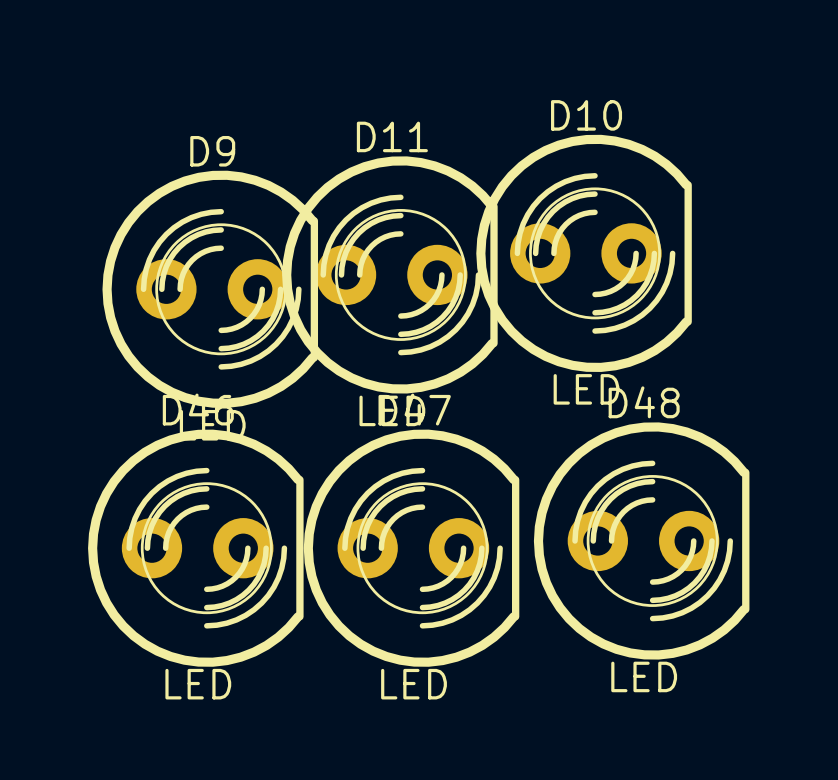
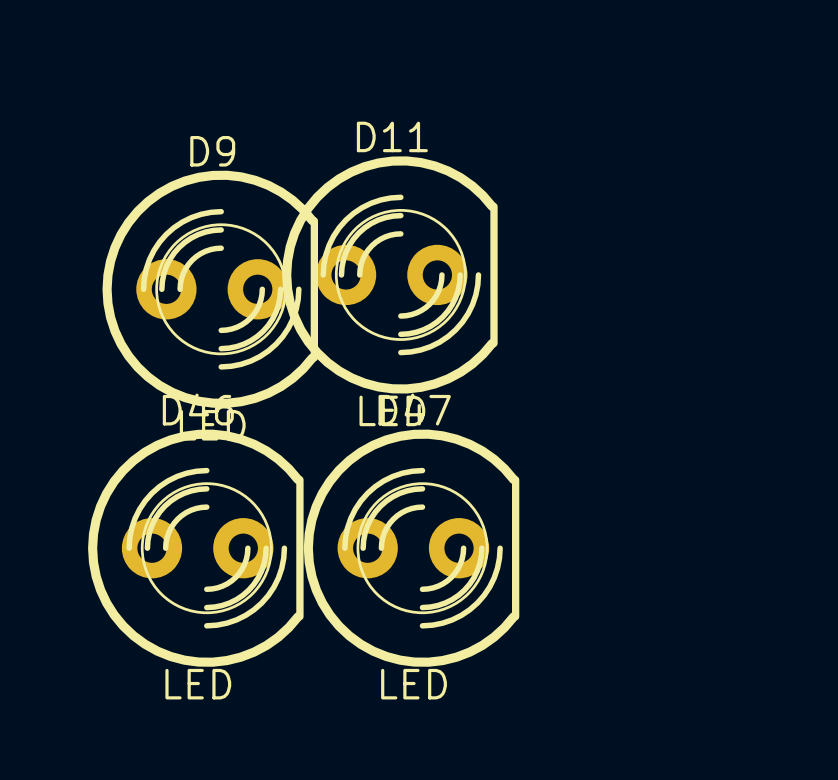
D10: LED (584, 253) -> none
D48: LED (641, 540) -> none

